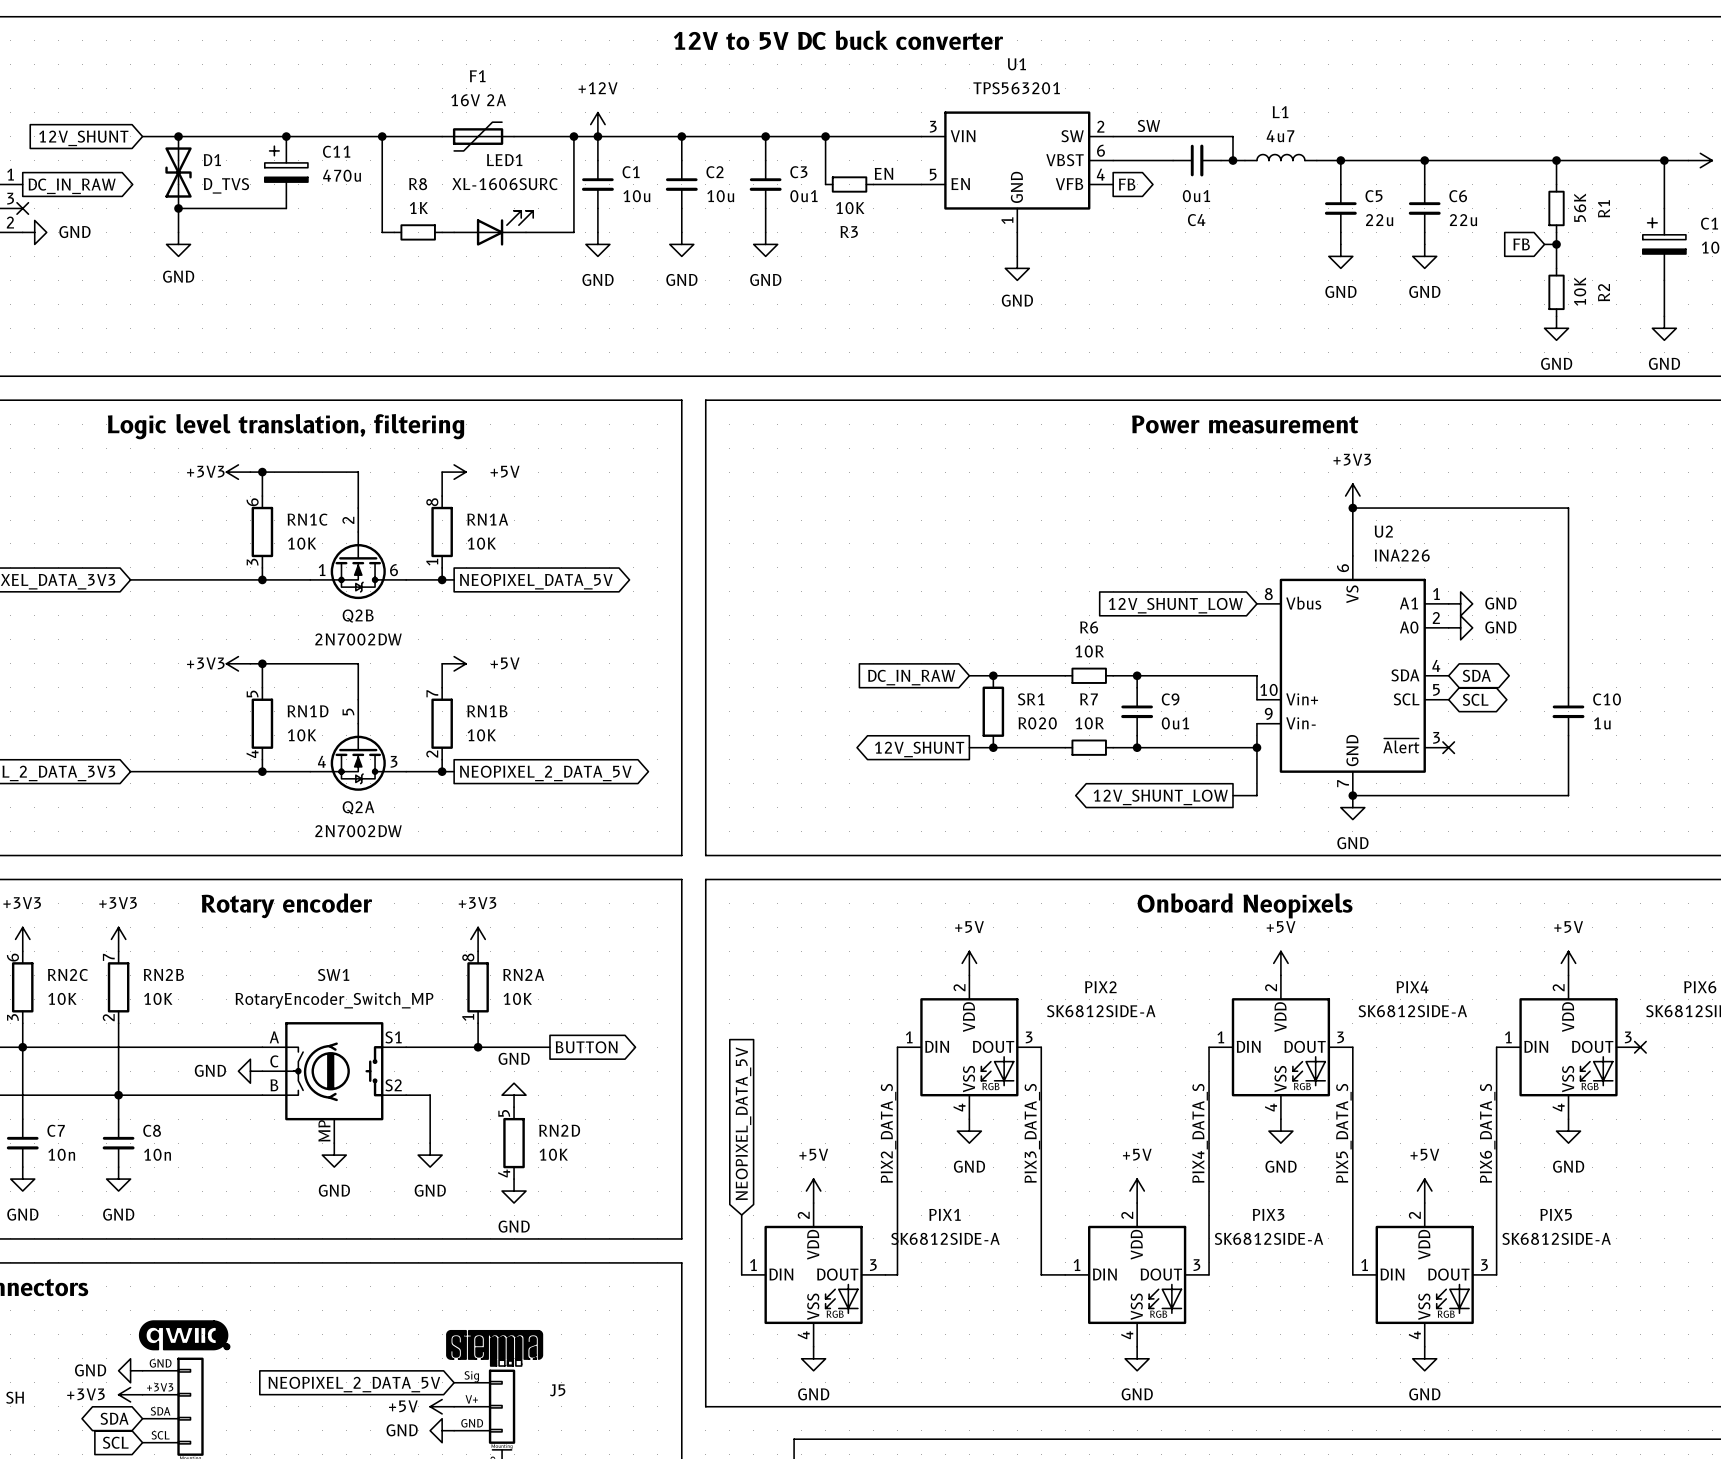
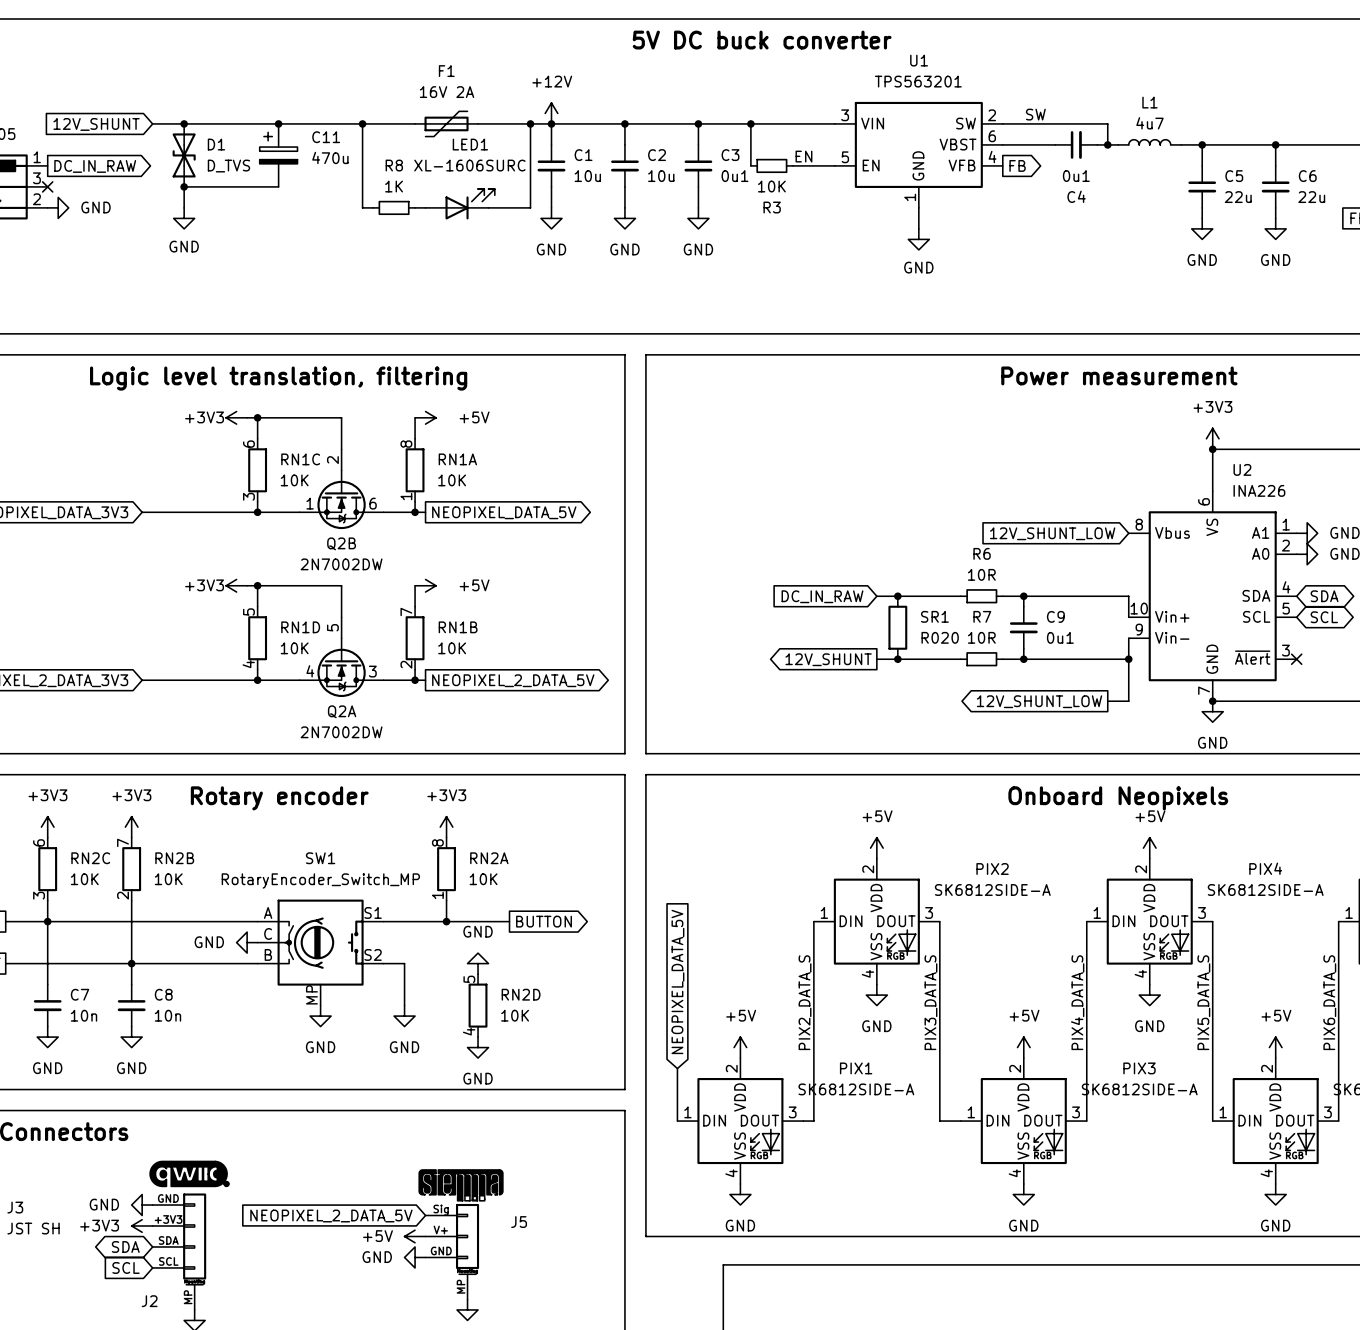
text: 12V to 5V DC buck converter (838, 40) -> 5V DC buck converter (762, 40)

